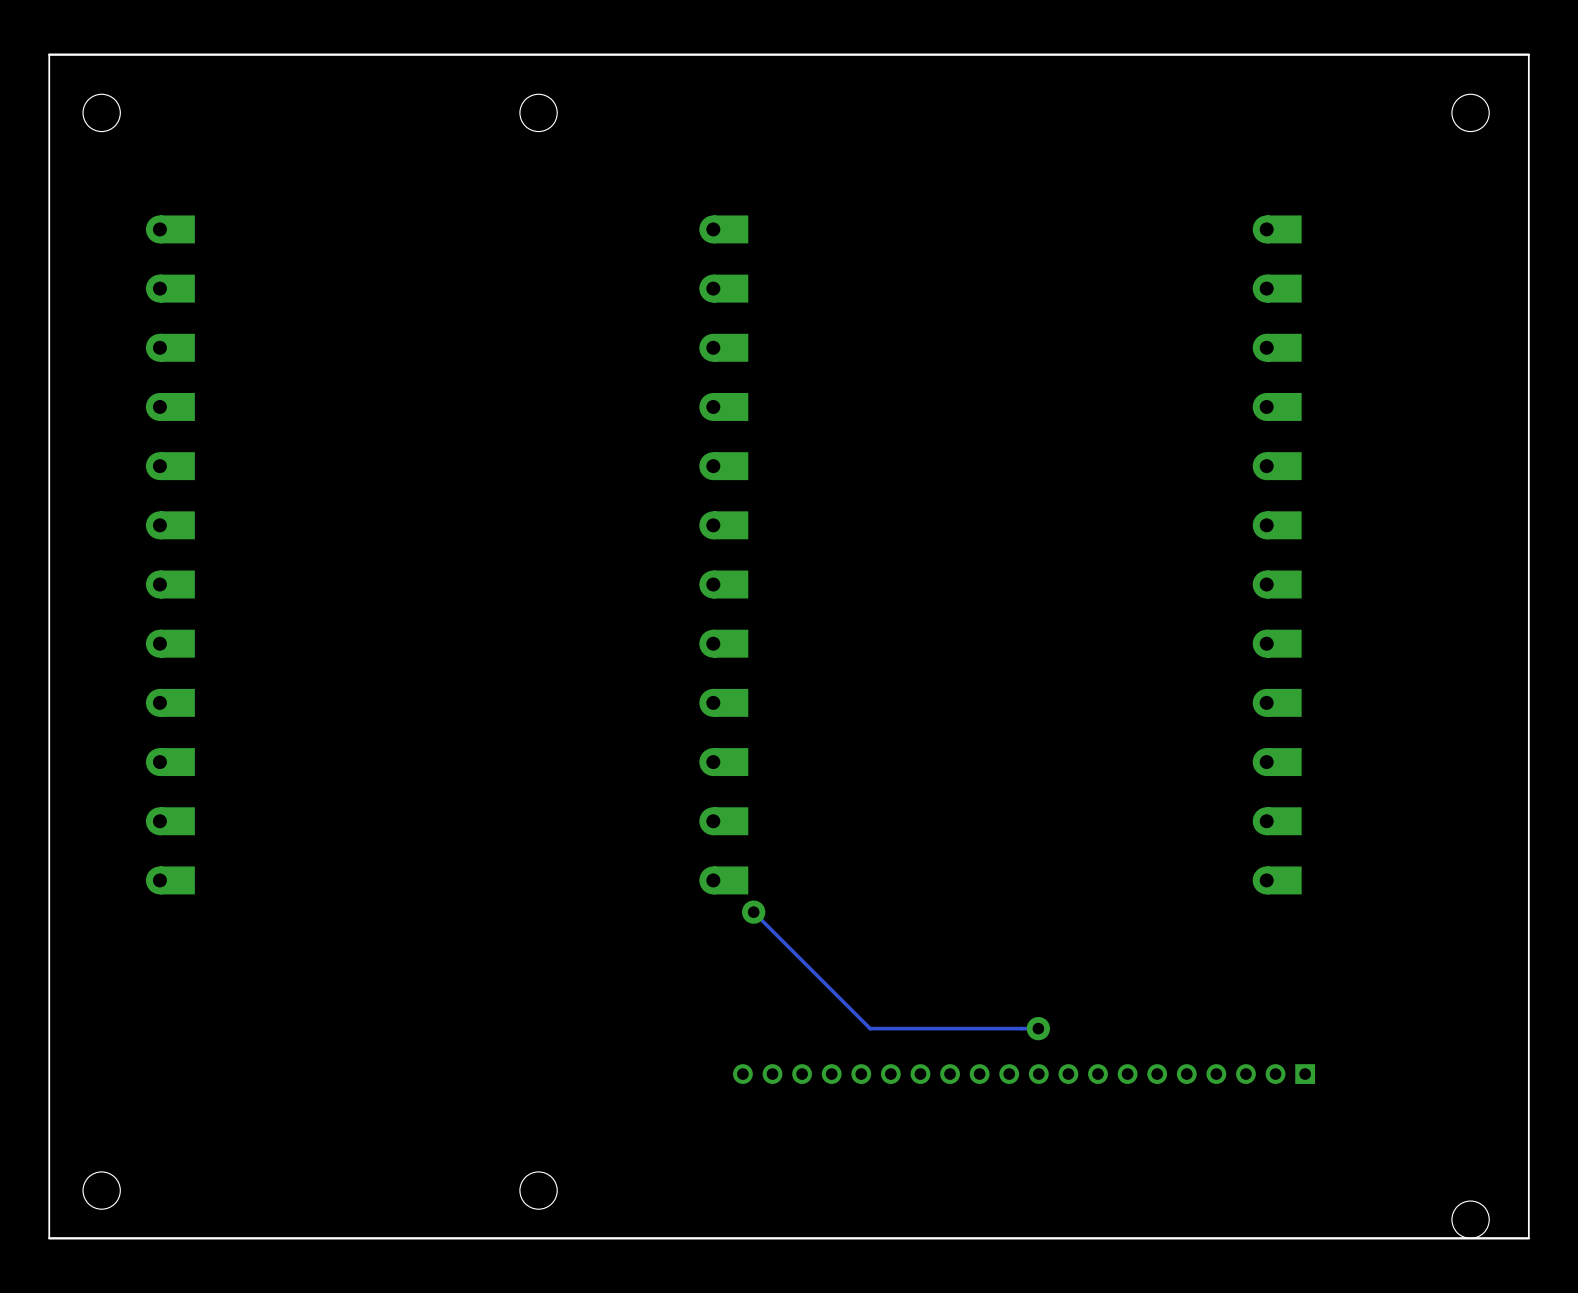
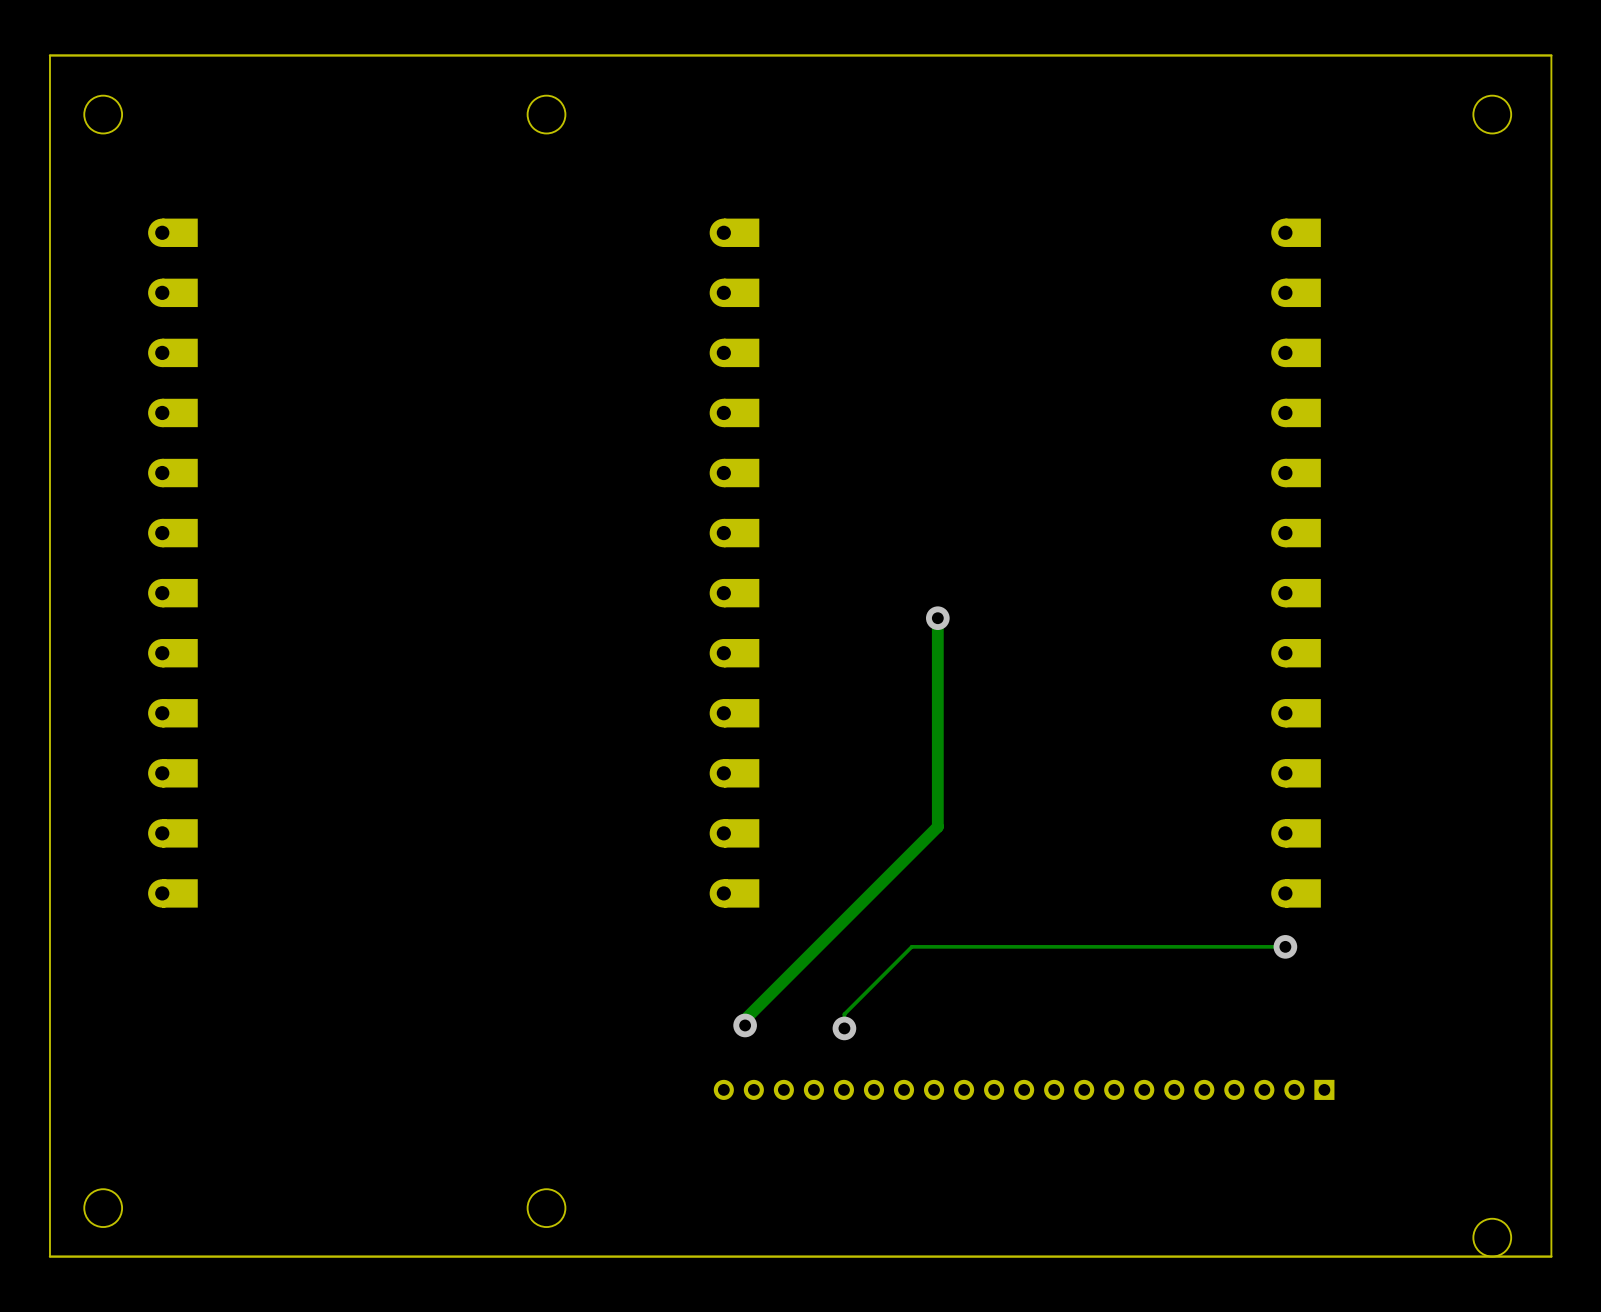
track: none -> (937, 618) (937, 826) (745, 1019) (745, 1025)
via: none -> (937, 618)
track: (753, 912) (870, 1028) (1038, 1028) -> none
via: (753, 912) -> none
track: none -> (1285, 946) (911, 946) (844, 1014) (844, 1028)
via: none -> (1285, 946)
via: none -> (745, 1025)
via: none -> (844, 1028)
via: (1038, 1028) -> none
part: none -> (1024, 1089)

